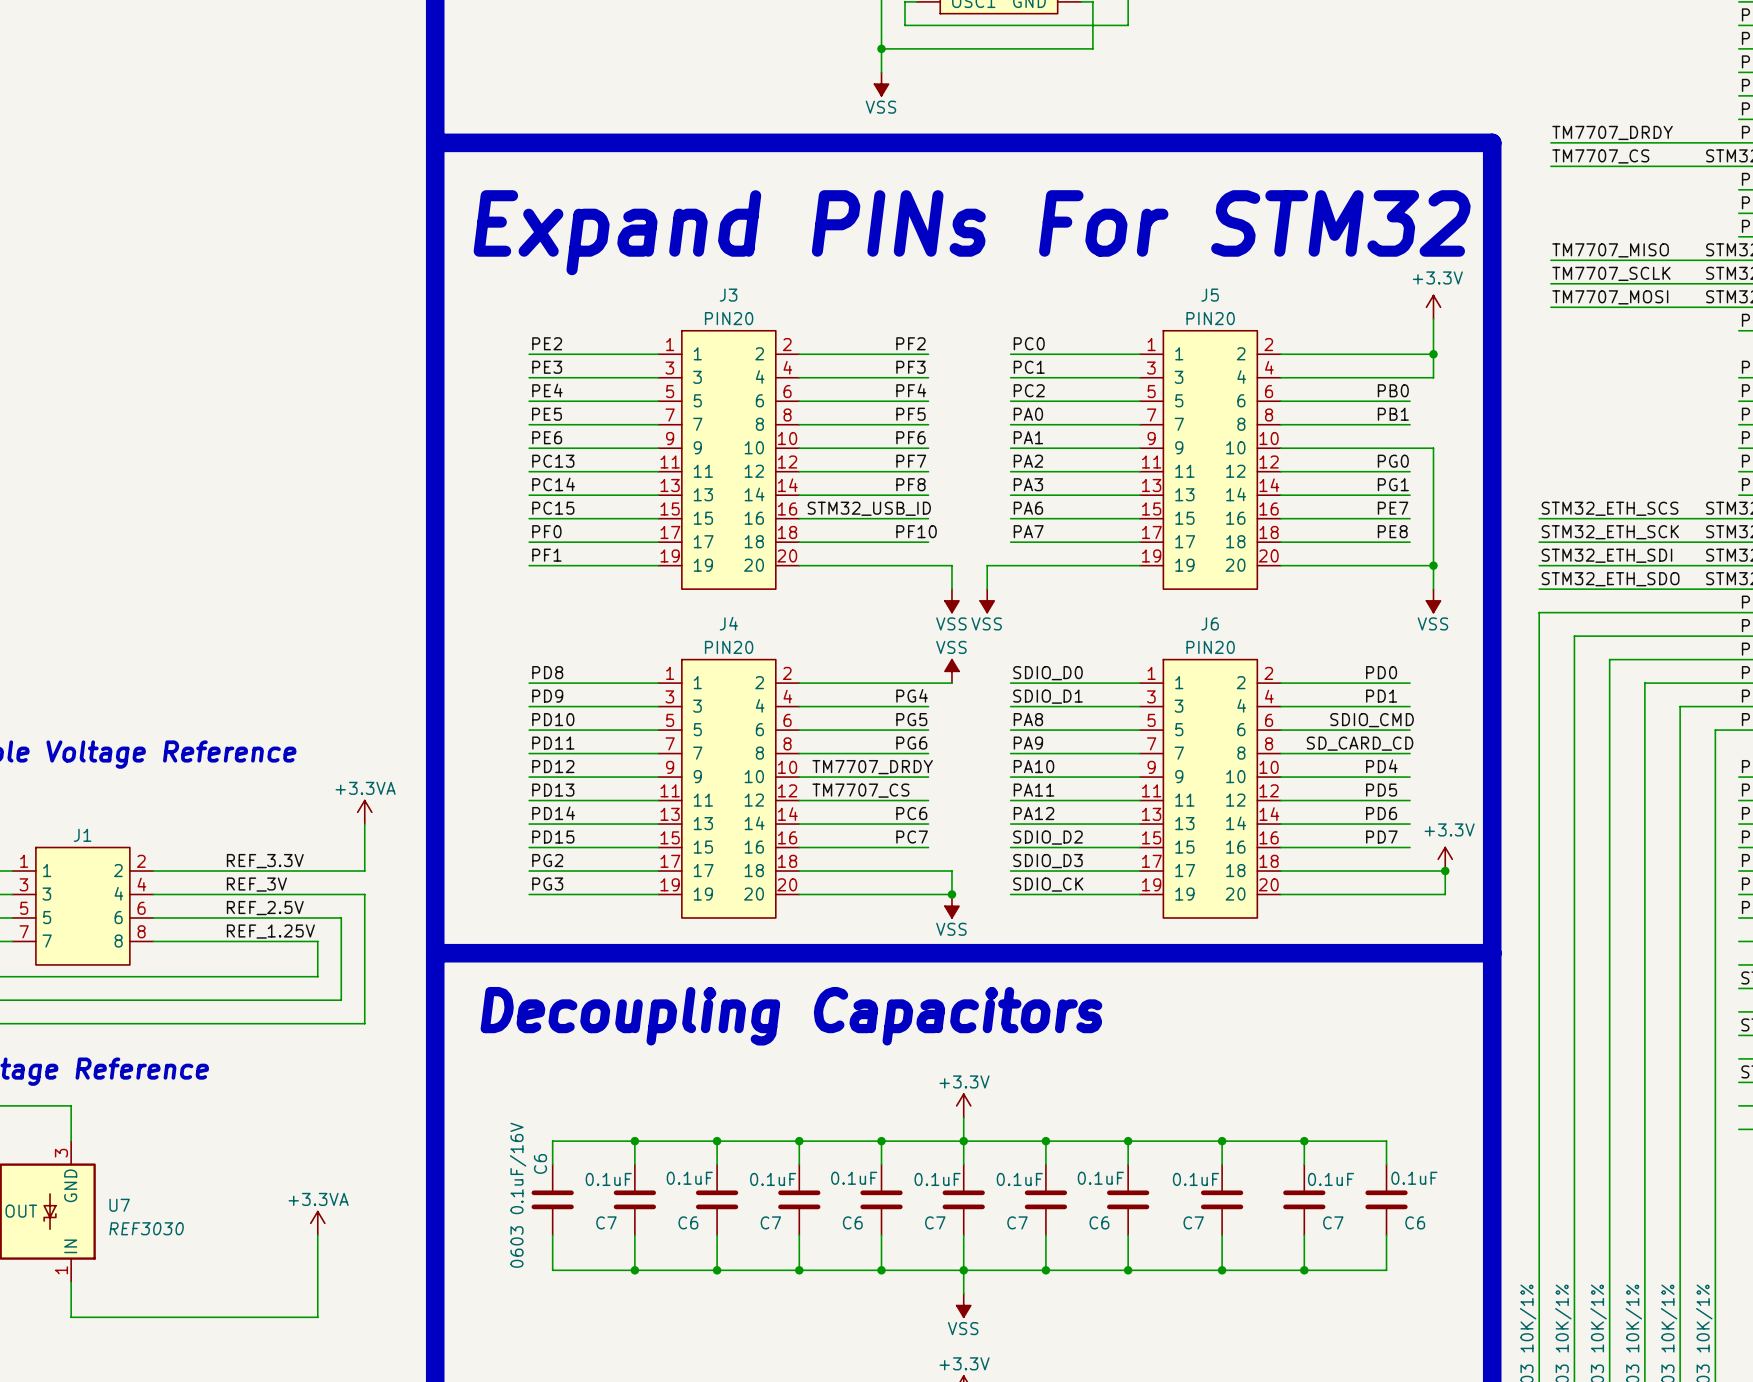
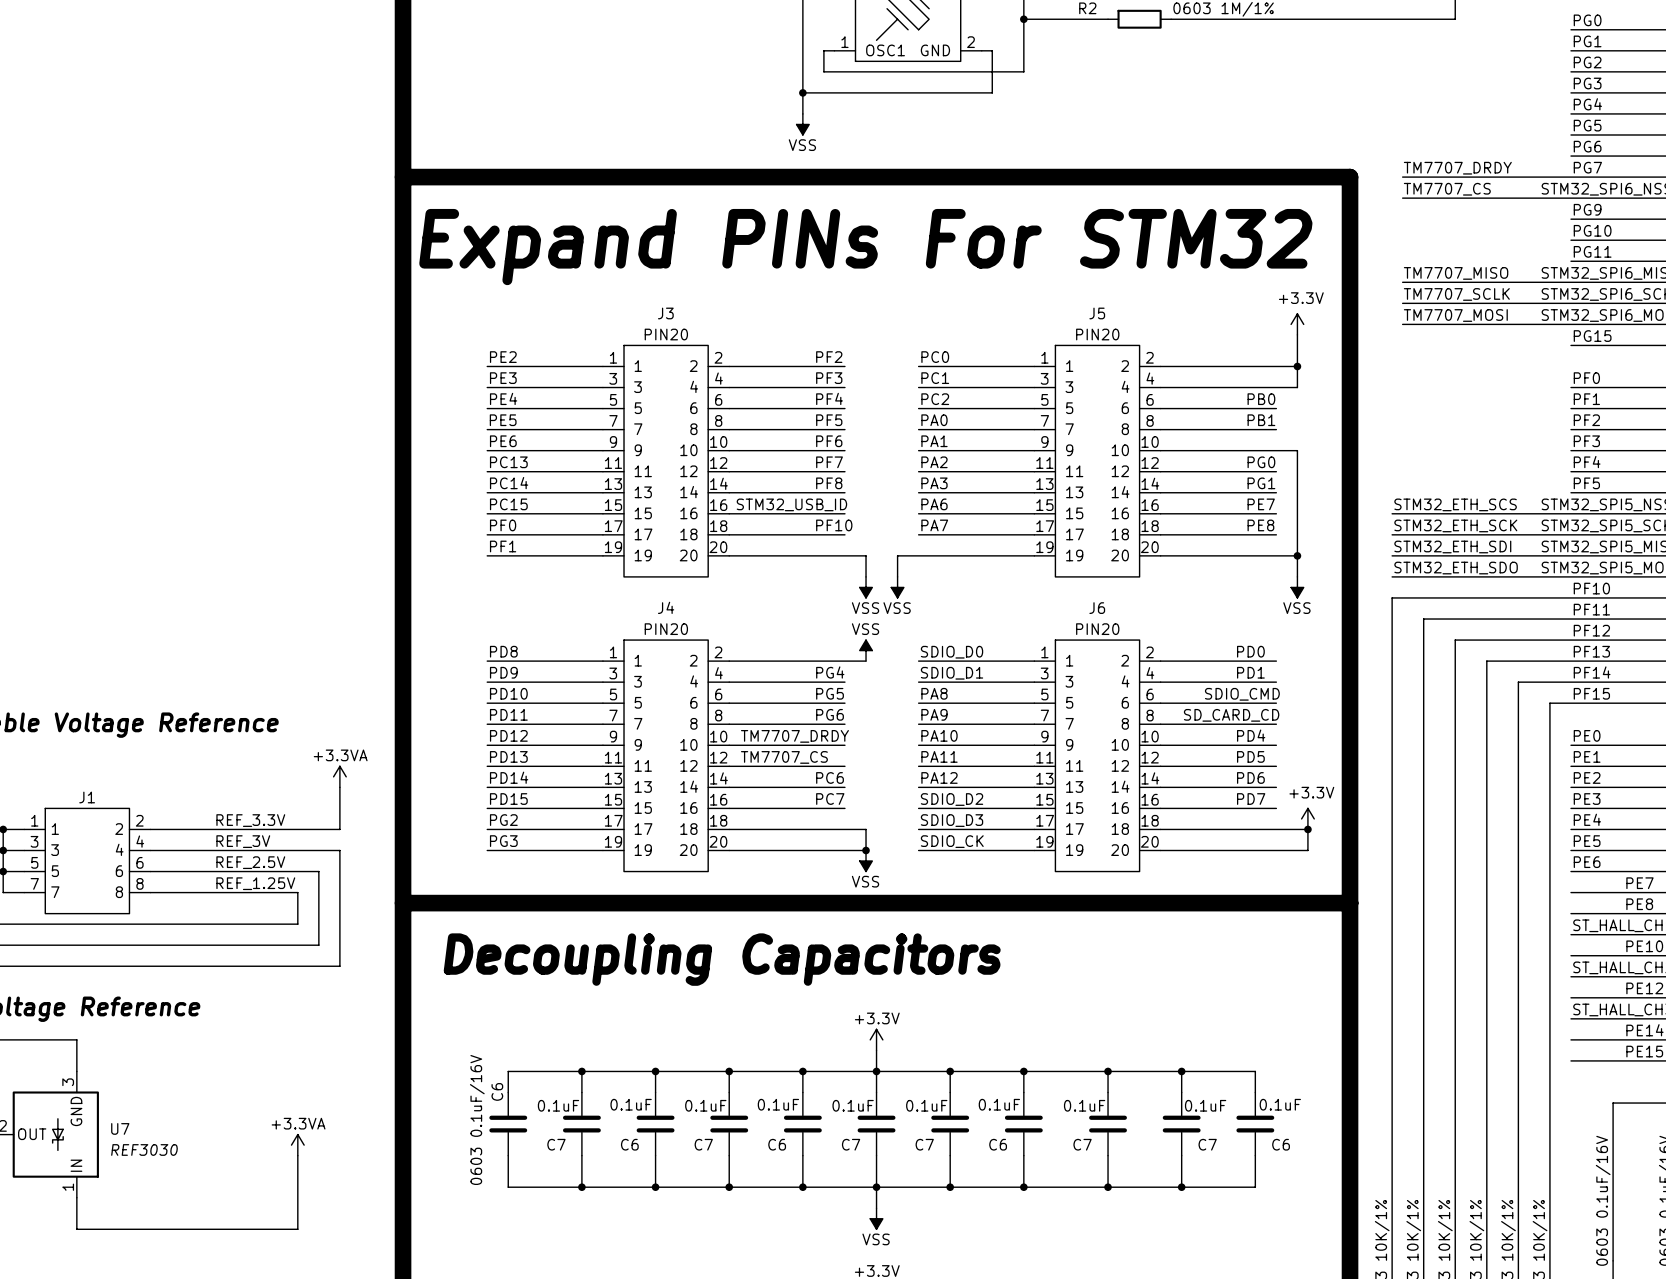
text: none -> Expand PINs For STM32 (865, 247)
text: Expand PINs For STM32 (972, 232) -> none

